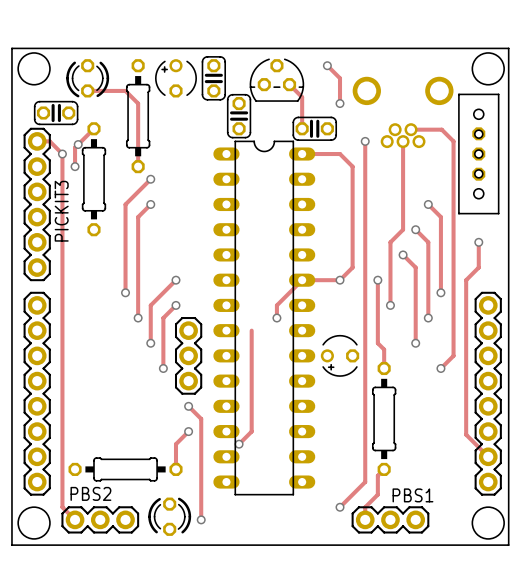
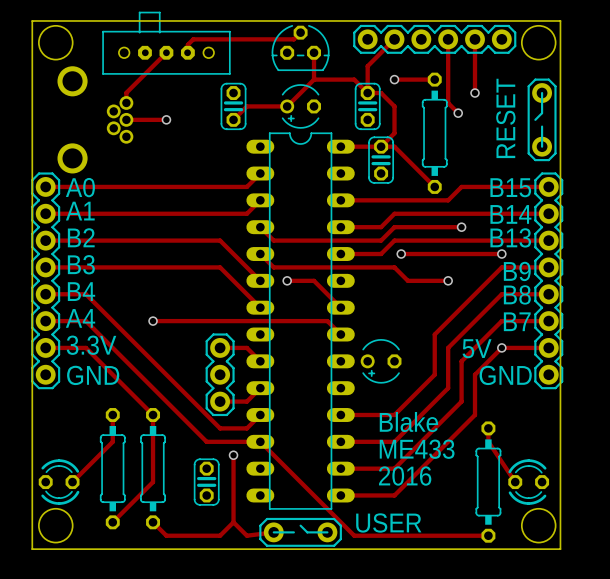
track: none -> (300, 32) (293, 39) (193, 39) (187, 44) (187, 52)
track: (327, 65) (340, 78) (340, 103) -> none
via: (327, 65) -> none
track: none -> (394, 39) (367, 66) (367, 93)
part: none -> (434, 39)
track: none -> (448, 39) (448, 103) (458, 113)
track: none -> (475, 39) (475, 93)
part: none -> (166, 43)
part: (87, 78) -> none
track: none -> (166, 52) (126, 92) (126, 102)
part rotation: 0° (175, 78) -> 90° counterclockwise (300, 106)
part position: (175, 78) -> (300, 106)
part: (213, 78) -> none
track: none -> (314, 52) (314, 79)
part position: (276, 80) -> (300, 48)
track: (289, 84) (302, 97) (302, 128) -> none
track: (87, 90) (125, 90) (138, 103) (138, 166) -> none
track: none -> (314, 79) (287, 106) (246, 106) (233, 119)
track: none -> (314, 79) (354, 79) (367, 93)
via position: (340, 103) -> (394, 79)
track: none -> (394, 79) (434, 79)
part: (403, 112) -> none
part: (56, 113) -> none
part: (138, 116) -> none
part: (239, 116) -> none
track: none -> (367, 93) (381, 93) (394, 106) (394, 133) (381, 146)
via: none -> (475, 93)
track: (93, 128) (75, 147) (75, 166) -> none
part: none -> (233, 106)
part rotation: 0° (314, 128) -> 90° clockwise (367, 106)
track: (411, 129) (441, 129) (453, 141) (453, 355) -> (548, 347) (501, 347)
via: none -> (458, 113)
track: (37, 141) (49, 141) (62, 154) (62, 507) (75, 519) -> none
part: none -> (95, 119)
track: none -> (126, 119) (166, 119)
via: none -> (166, 119)
track: (365, 141) (365, 482) -> (488, 361) (475, 374) (475, 414) (407, 482)
via: (365, 141) -> none
track: (403, 141) (403, 229) (390, 242) (390, 305) -> none
text: none -> RESET (505, 118)
part: none -> (542, 119)
via: (78, 144) -> none
via: (62, 154) -> none
track: (302, 154) (340, 154) (352, 166) (352, 267) (340, 280) -> (448, 280) (407, 280) (394, 267) (381, 267)
part: none -> (434, 133)
part: (478, 154) -> none
via: (75, 166) -> none
track: none -> (340, 146) (394, 146) (434, 186)
part: (93, 179) -> none
track: (150, 179) (125, 204) (125, 292) -> none
via: (150, 179) -> none
part: none -> (381, 160)
track: none -> (260, 173) (246, 186) (45, 186)
PICKIT3: (37, 204) -> none
track: (150, 204) (138, 217) (138, 318) -> none
via: (150, 204) -> none
track: (428, 204) (440, 217) (440, 292) -> none
via: (428, 204) -> none
track: none -> (548, 186) (461, 186) (448, 200) (340, 200)
text: none -> A0 (80, 187)
text: none -> B15 (510, 187)
track: none -> (260, 200) (246, 213) (45, 213)
text: none -> A1 (80, 211)
track: (415, 229) (428, 242) (428, 318) -> none
via: (415, 229) -> none
text: none -> B14 (510, 214)
track: none -> (548, 213) (394, 213) (381, 227) (340, 227)
track: none -> (260, 227) (273, 240) (381, 240) (394, 227) (461, 227)
via: none -> (461, 227)
track: (478, 242) (478, 267) (466, 280) (466, 434) (488, 456) -> none
via: (478, 242) -> none
text: none -> B2 (81, 237)
text: none -> B13 (510, 237)
track: none -> (45, 240) (220, 240) (260, 280)
track: (403, 254) (415, 267) (415, 343) -> none
via: (403, 254) -> none
track: none -> (548, 240) (394, 240) (381, 254) (340, 254)
track: none -> (401, 254) (501, 254)
via: none -> (401, 254)
via: none -> (501, 254)
text: none -> B3 (81, 264)
track: none -> (45, 267) (220, 267) (260, 307)
track: (175, 280) (150, 305) (150, 343) -> none
via: (175, 280) -> none
track: (302, 280) (276, 305) (276, 318) -> (340, 267) (273, 267) (260, 254)
via: (340, 280) -> none
track: (377, 280) (377, 343) (384, 349) (384, 368) -> none
via: (377, 280) -> none
track: none -> (548, 267) (501, 267) (434, 334) (434, 374) (394, 414) (340, 414)
text: none -> B9 (517, 271)
via: (125, 292) -> none
track: none -> (287, 280) (314, 280) (340, 307)
via: none -> (448, 280)
via: (440, 292) -> none
text: none -> B4 (81, 291)
track: none -> (45, 294) (85, 294) (220, 428) (246, 428) (260, 414)
track: (175, 305) (163, 318) (163, 368) -> none
via: (175, 305) -> none
via: (390, 305) -> none
track: none -> (548, 294) (501, 294) (448, 347) (448, 388) (394, 441) (340, 441)
text: none -> B8 (517, 294)
via: (138, 318) -> none
part position: (264, 318) -> (300, 321)
via position: (276, 318) -> (287, 280)
via: (428, 318) -> none
text: none -> A4 (80, 318)
track: none -> (45, 321) (85, 321) (206, 441) (260, 441) (354, 535) (488, 535)
track: none -> (153, 321) (327, 321) (340, 334)
via: none -> (153, 321)
track: (251, 330) (251, 431) (239, 444) -> none
track: none -> (548, 321) (501, 321) (461, 361) (461, 401) (394, 468) (340, 468)
text: none -> B7 (517, 321)
via: (150, 343) -> none
via: (415, 343) -> none
text: none -> 3.3V (91, 345)
track: none -> (45, 347) (85, 347) (153, 414) (153, 482) (112, 522)
track: none -> (220, 347) (246, 347) (260, 361)
part position: (188, 355) -> (220, 374)
part position: (340, 355) -> (381, 361)
text: none -> 5V (477, 348)
via: (163, 368) -> none
via position: (440, 368) -> (501, 347)
text: none -> GND (93, 375)
text: none -> GND (505, 375)
part position: (37, 393) -> (45, 280)
part position: (488, 393) -> (548, 280)
track: (188, 406) (201, 418) (201, 456) -> (220, 401) (246, 401) (260, 388)
via: (188, 406) -> none
track: none -> (112, 414) (112, 441) (72, 482)
part position: (384, 418) -> (488, 482)
text: none -> Blake (408, 422)
track: (188, 431) (175, 444) (175, 469) -> none
via: (188, 431) -> none
track: none -> (488, 428) (488, 441) (515, 482)
via: (239, 444) -> none
text: none -> ME433 (417, 449)
via: none -> (233, 455)
part: none -> (112, 468)
part rotation: 0° (125, 469) -> 90° clockwise (153, 468)
track: (384, 469) (377, 475) (377, 494) (365, 507) (365, 519) -> none
text: none -> 2016 (405, 476)
part: none -> (206, 482)
part: none -> (528, 482)
track: (352, 494) (340, 507) -> (394, 495) (340, 495)
via: (340, 507) -> none
part rotation: 0° (169, 516) -> 90° clockwise (59, 482)
part position: (169, 516) -> (59, 482)
PBS2: (100, 519) -> none
track: none -> (153, 522) (166, 535) (220, 535) (233, 522) (246, 535) (273, 532)
via: (201, 519) -> none
PBS1: (390, 519) -> none
text: none -> USER (388, 522)
part: none -> (300, 532)

